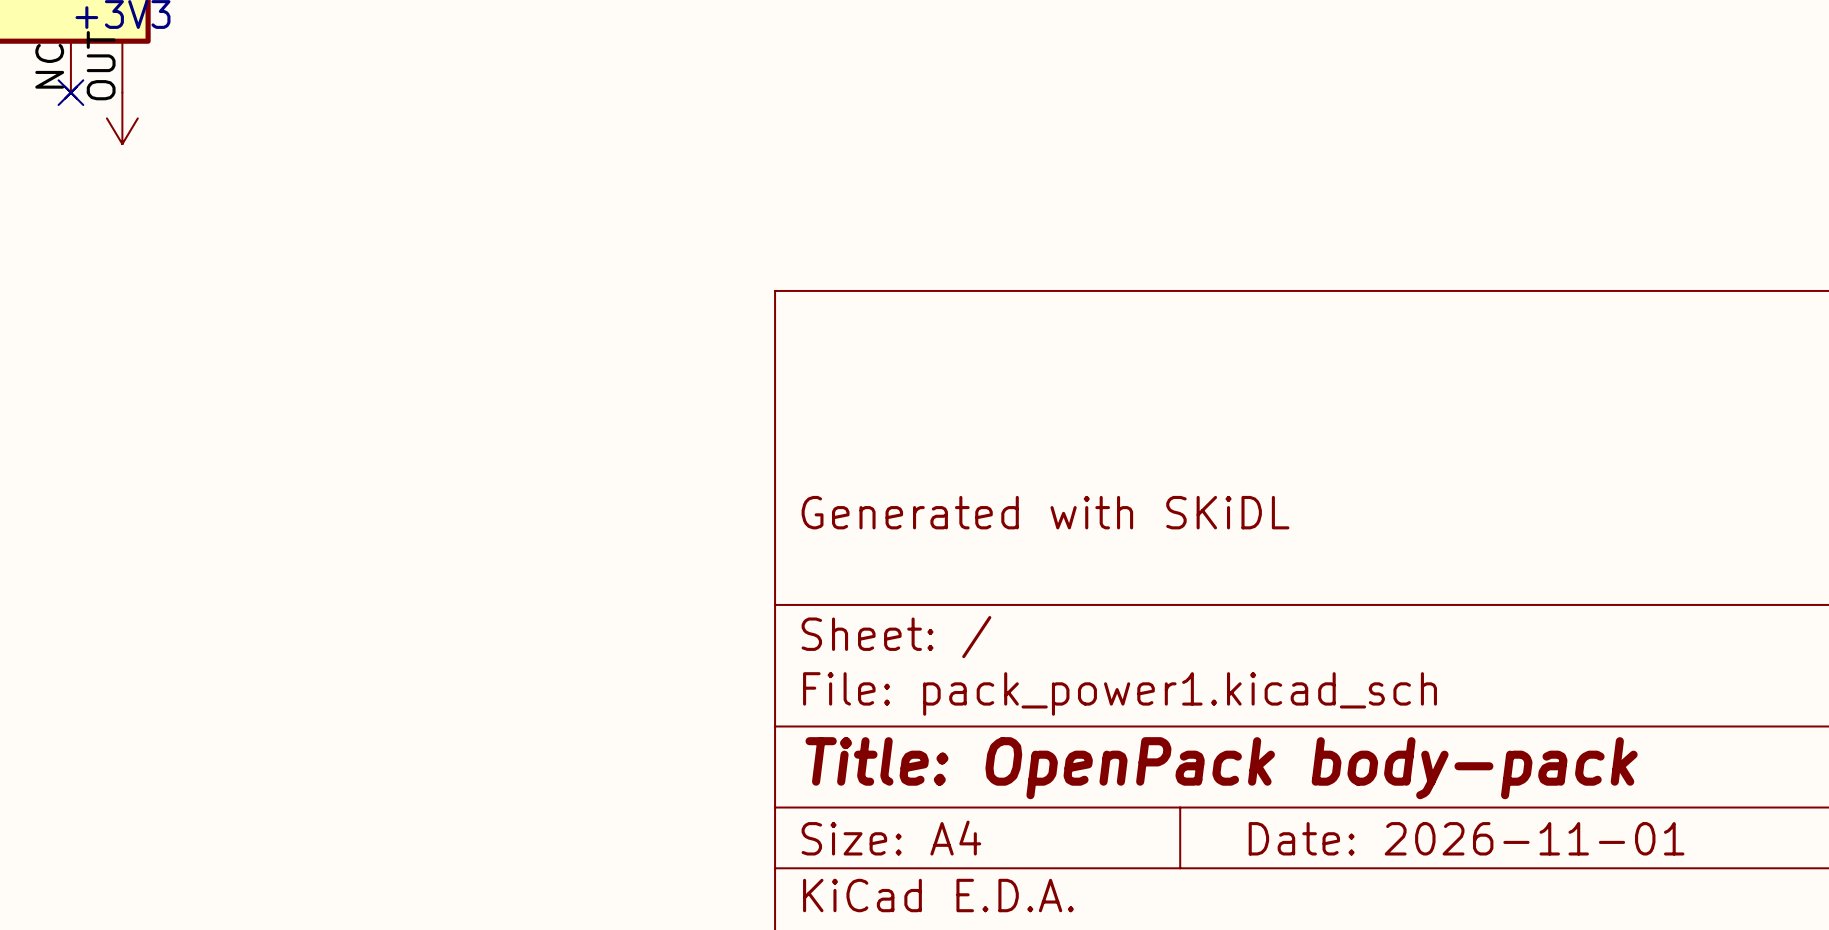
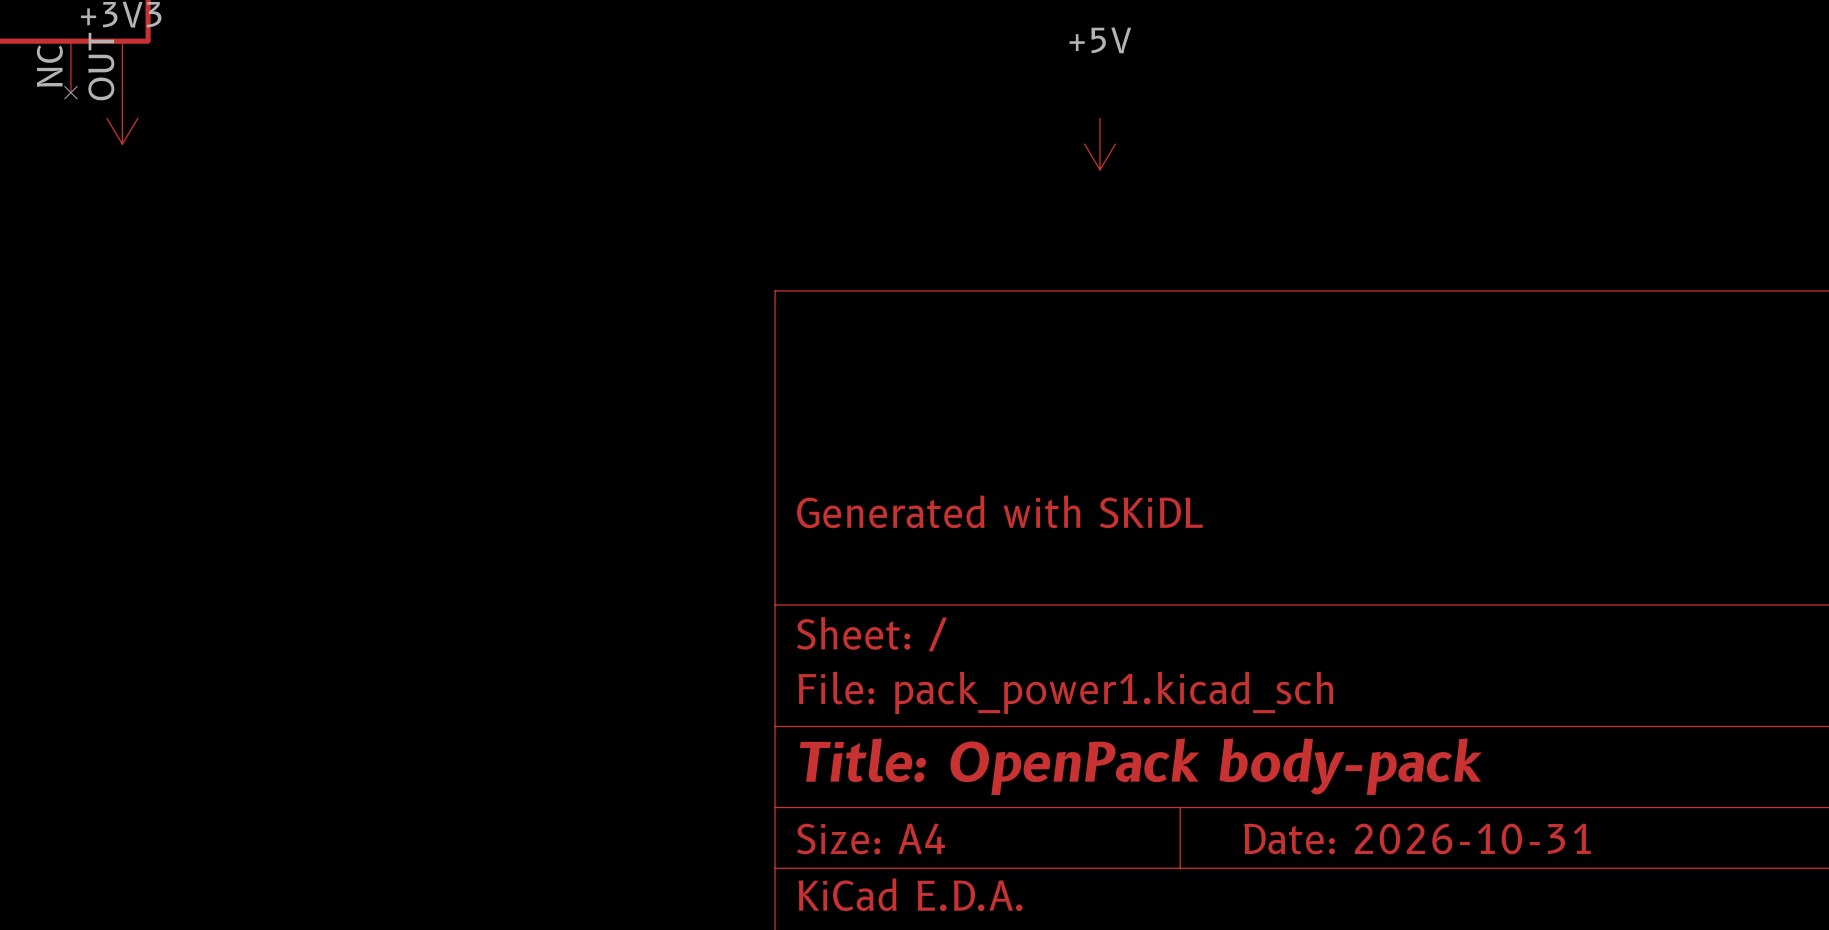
no-connect mark: (70, 92) -> none
power symbol: none -> +5V (1099, 144)
title block: Date: 2026-11-01 (1466, 838) -> Date: 2026-10-31 (1417, 838)

